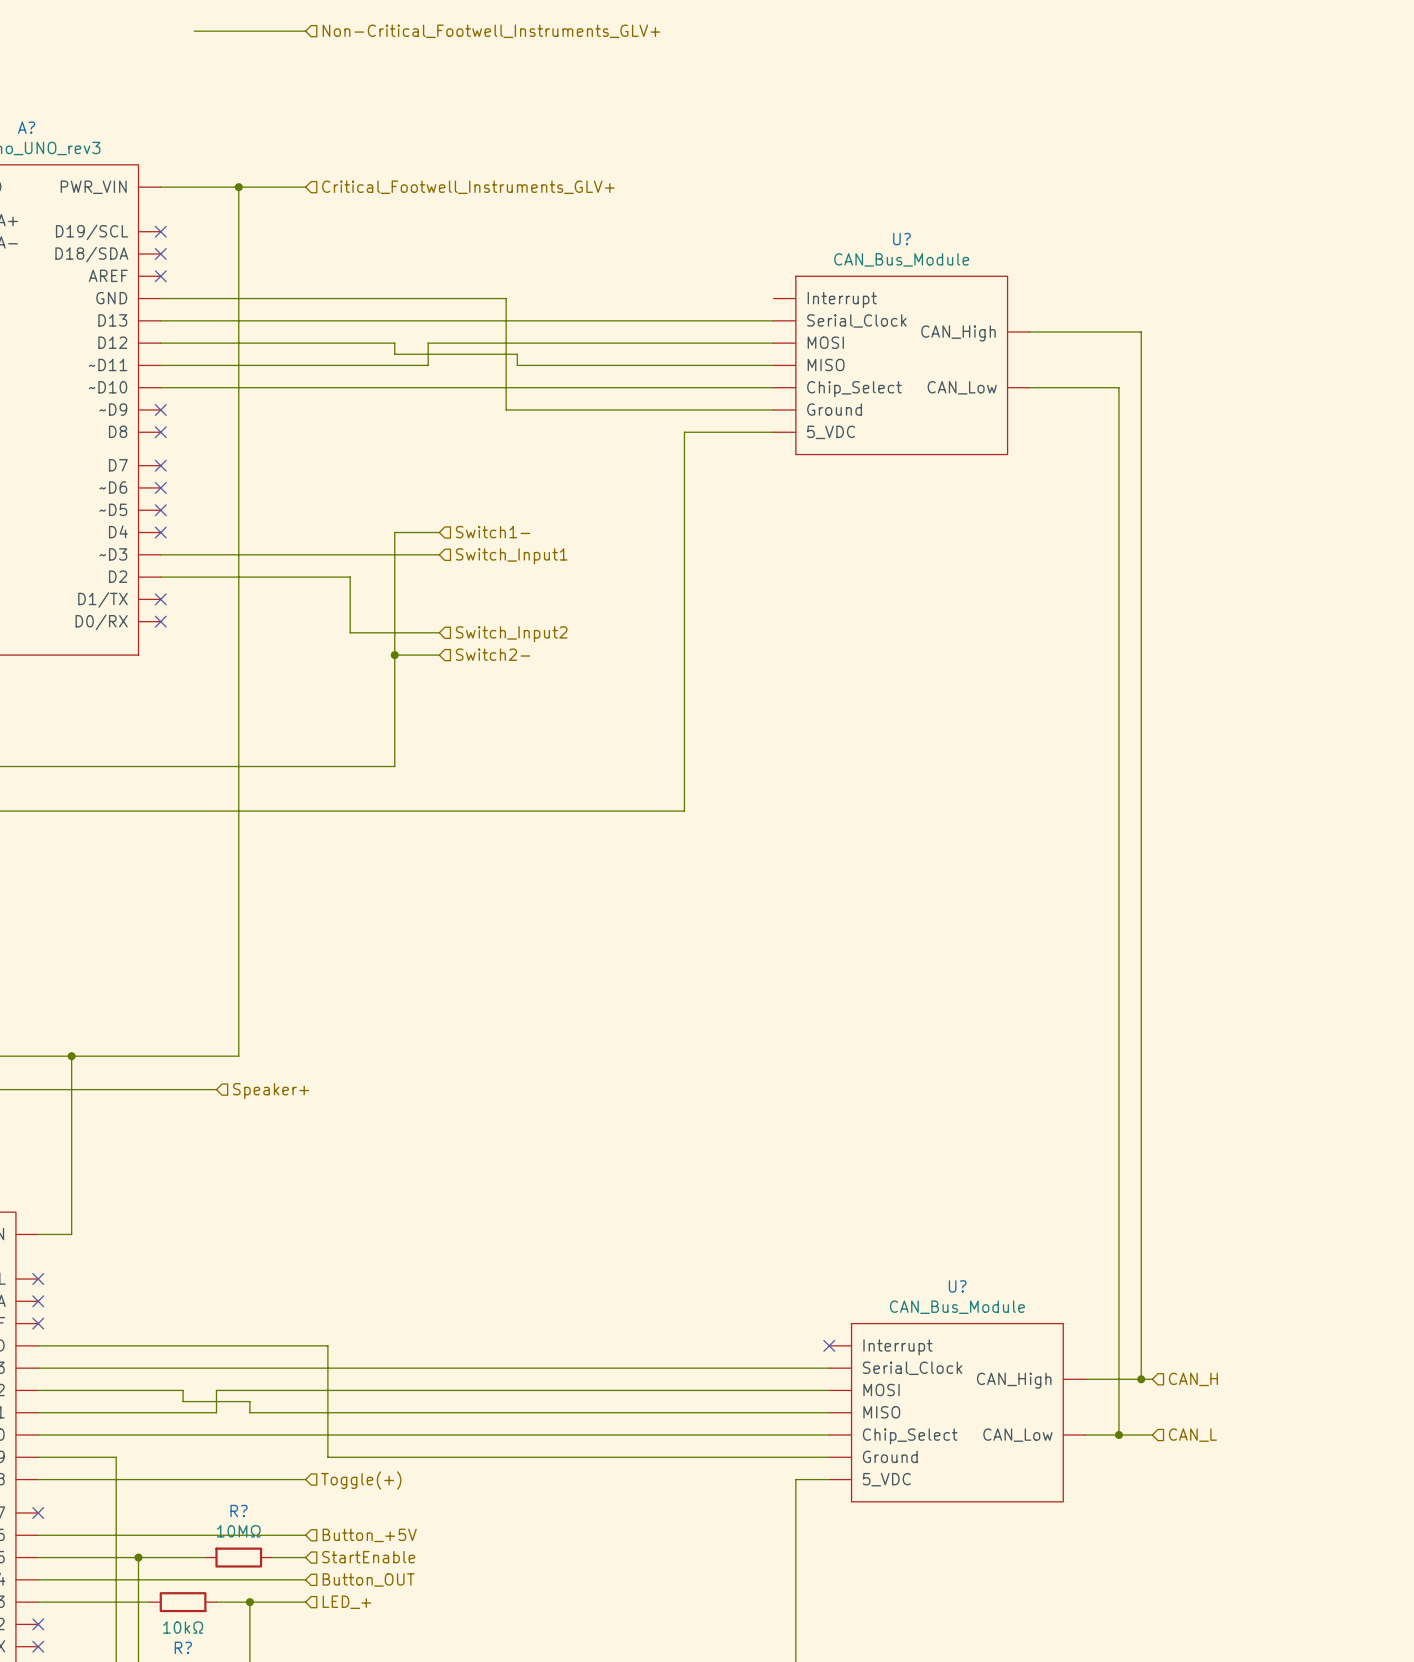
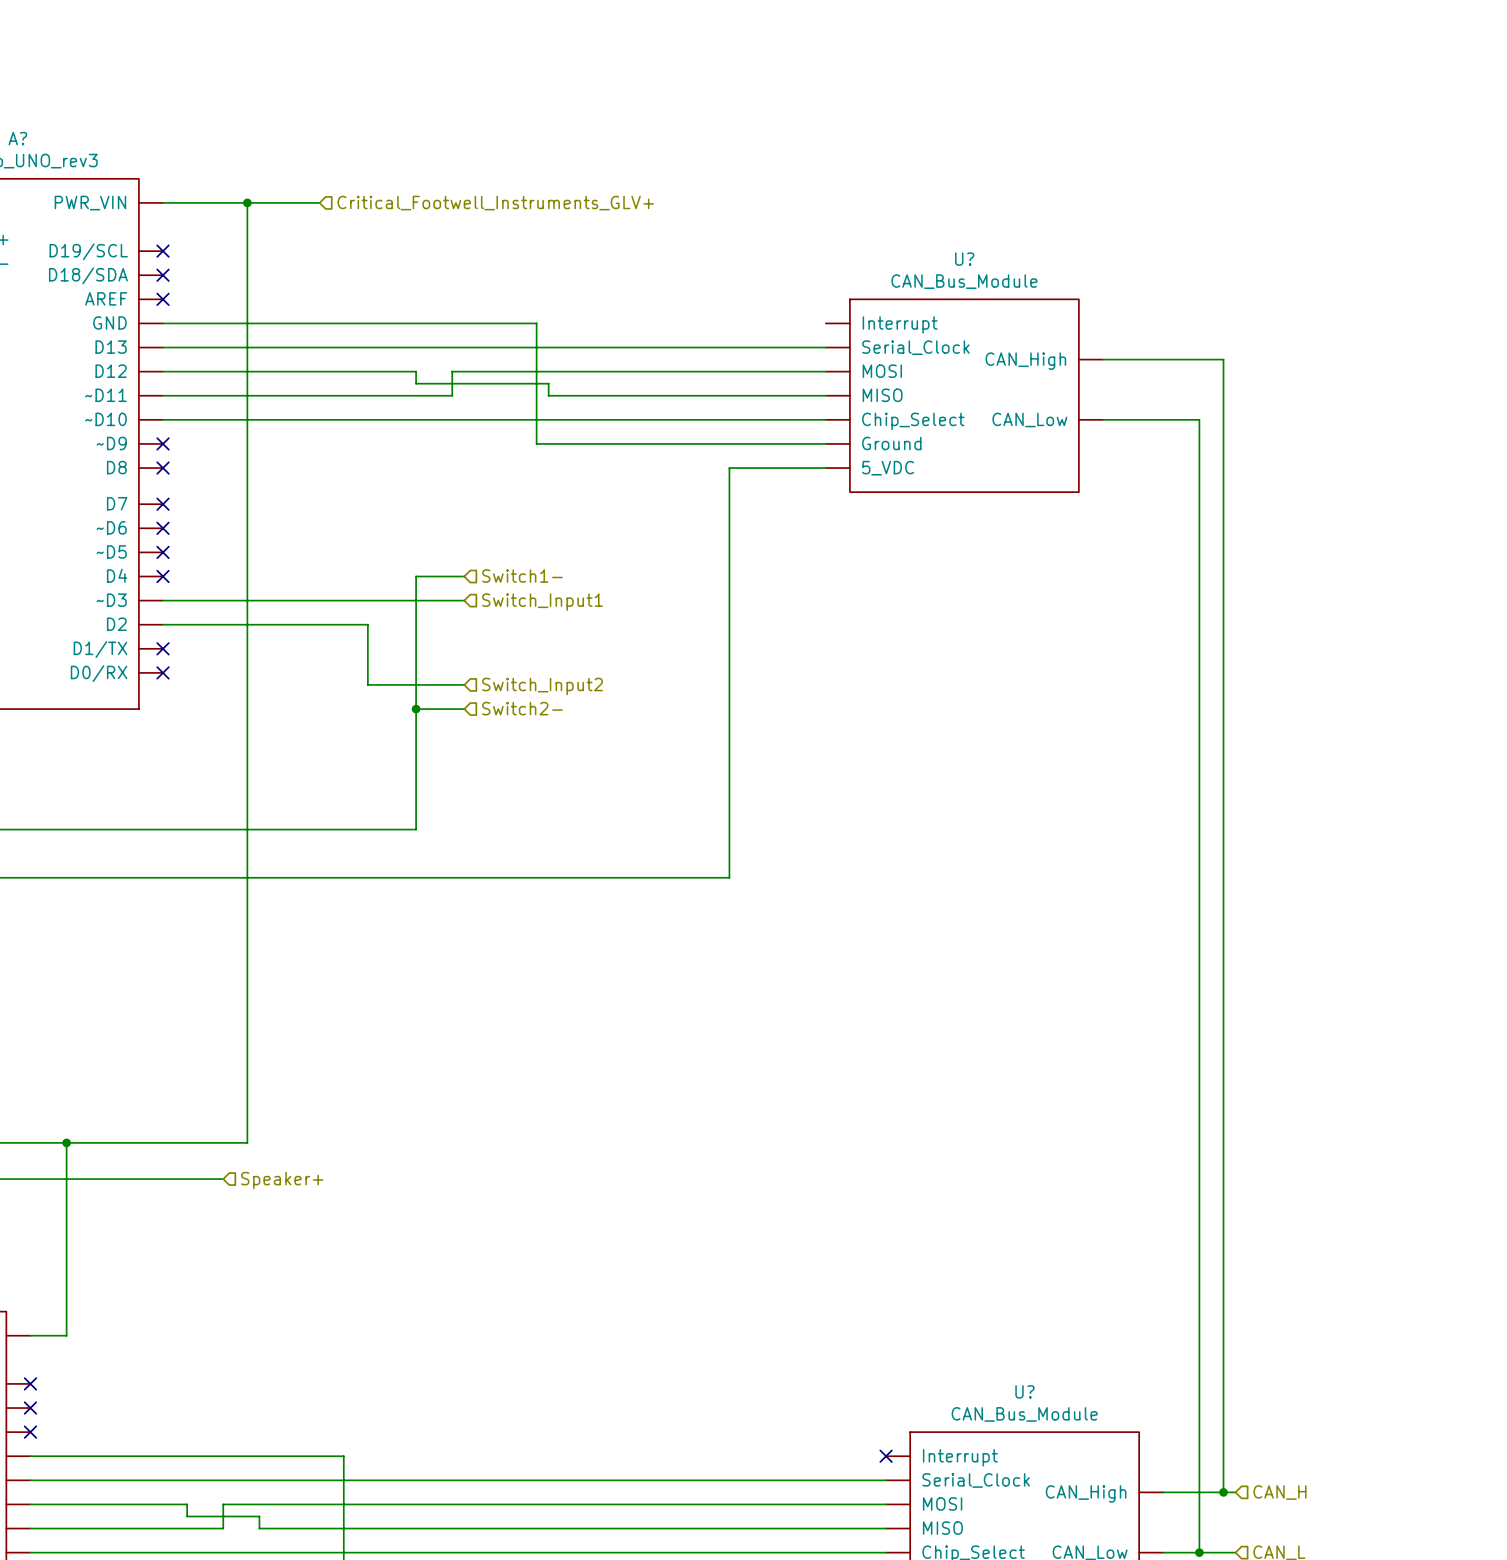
wire: (194, 31) (305, 31) -> none
hierarchical label: Non-Critical_Footwell_Instruments_GLV+ (491, 31) -> none

